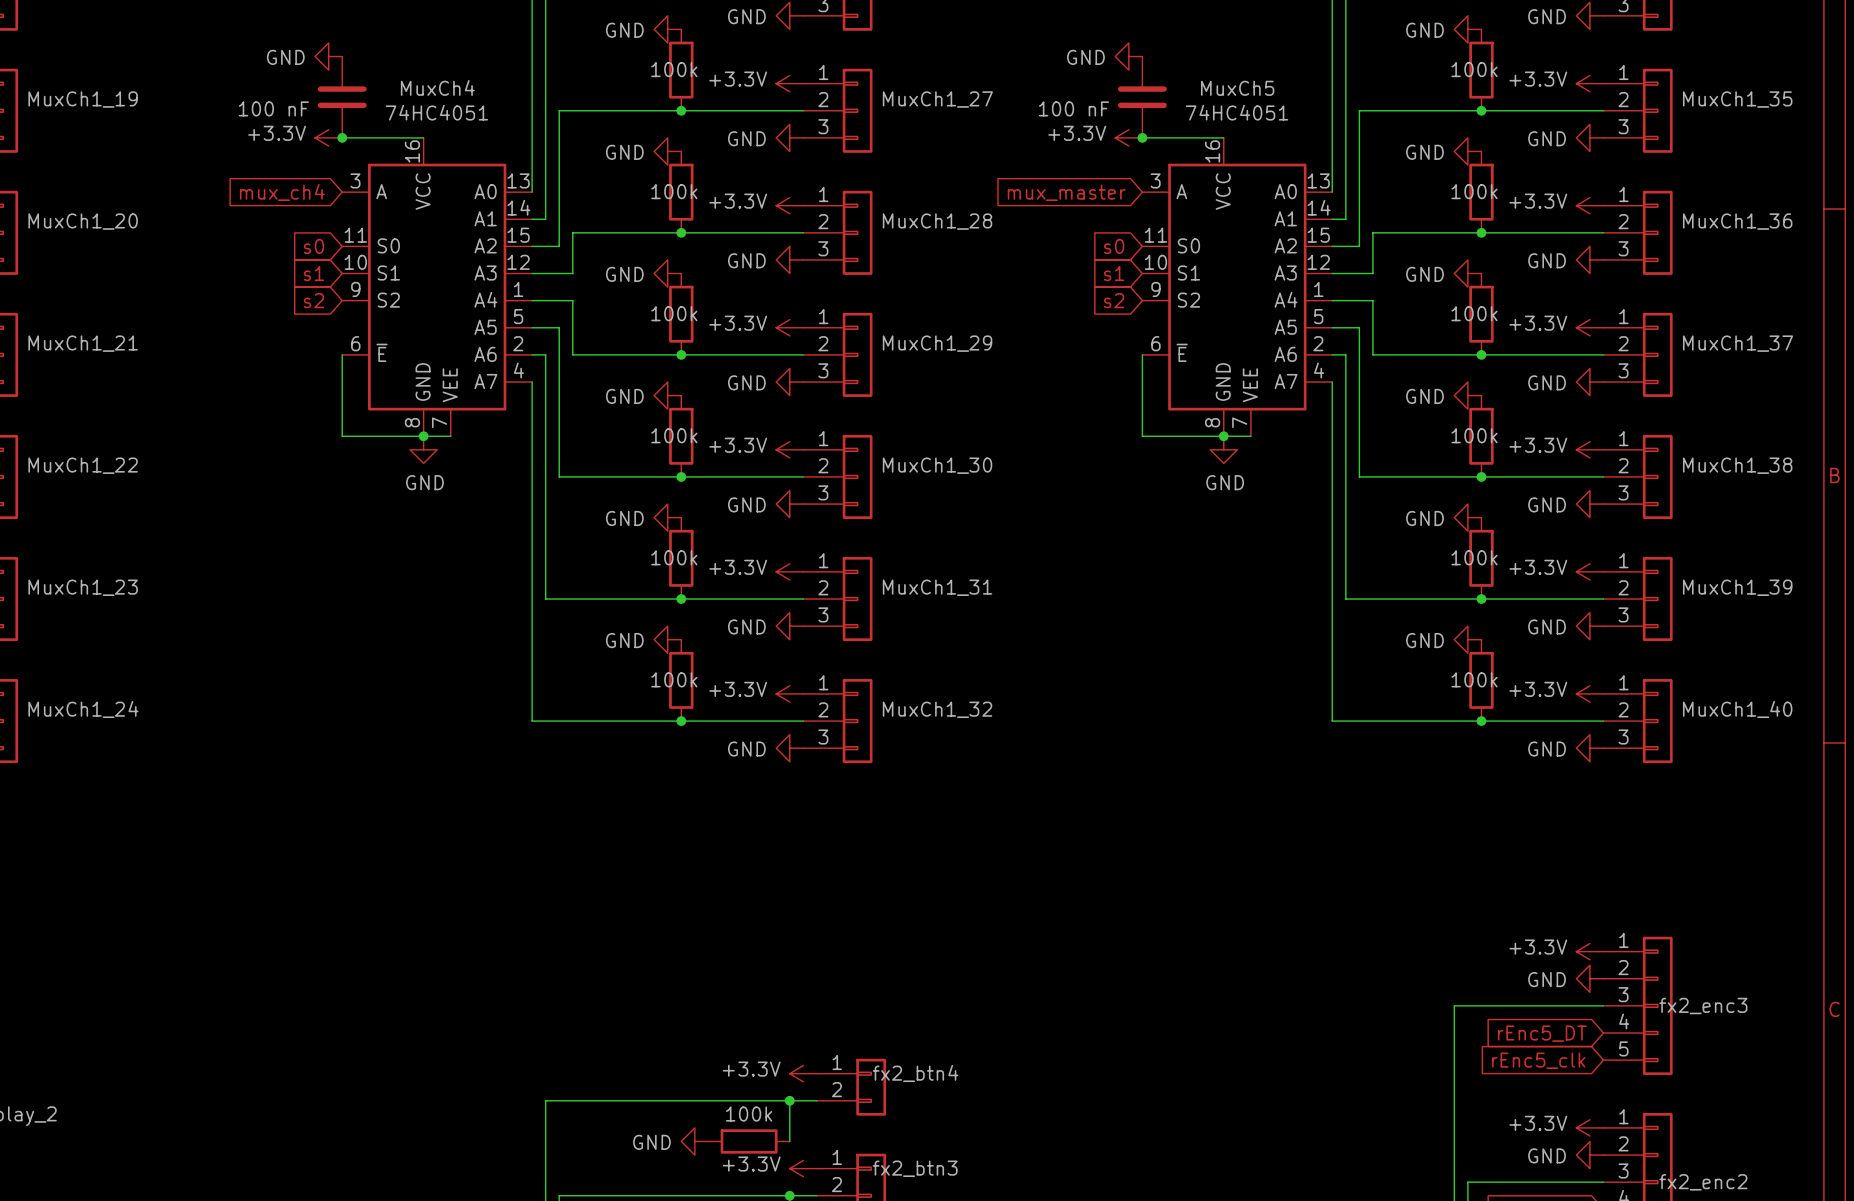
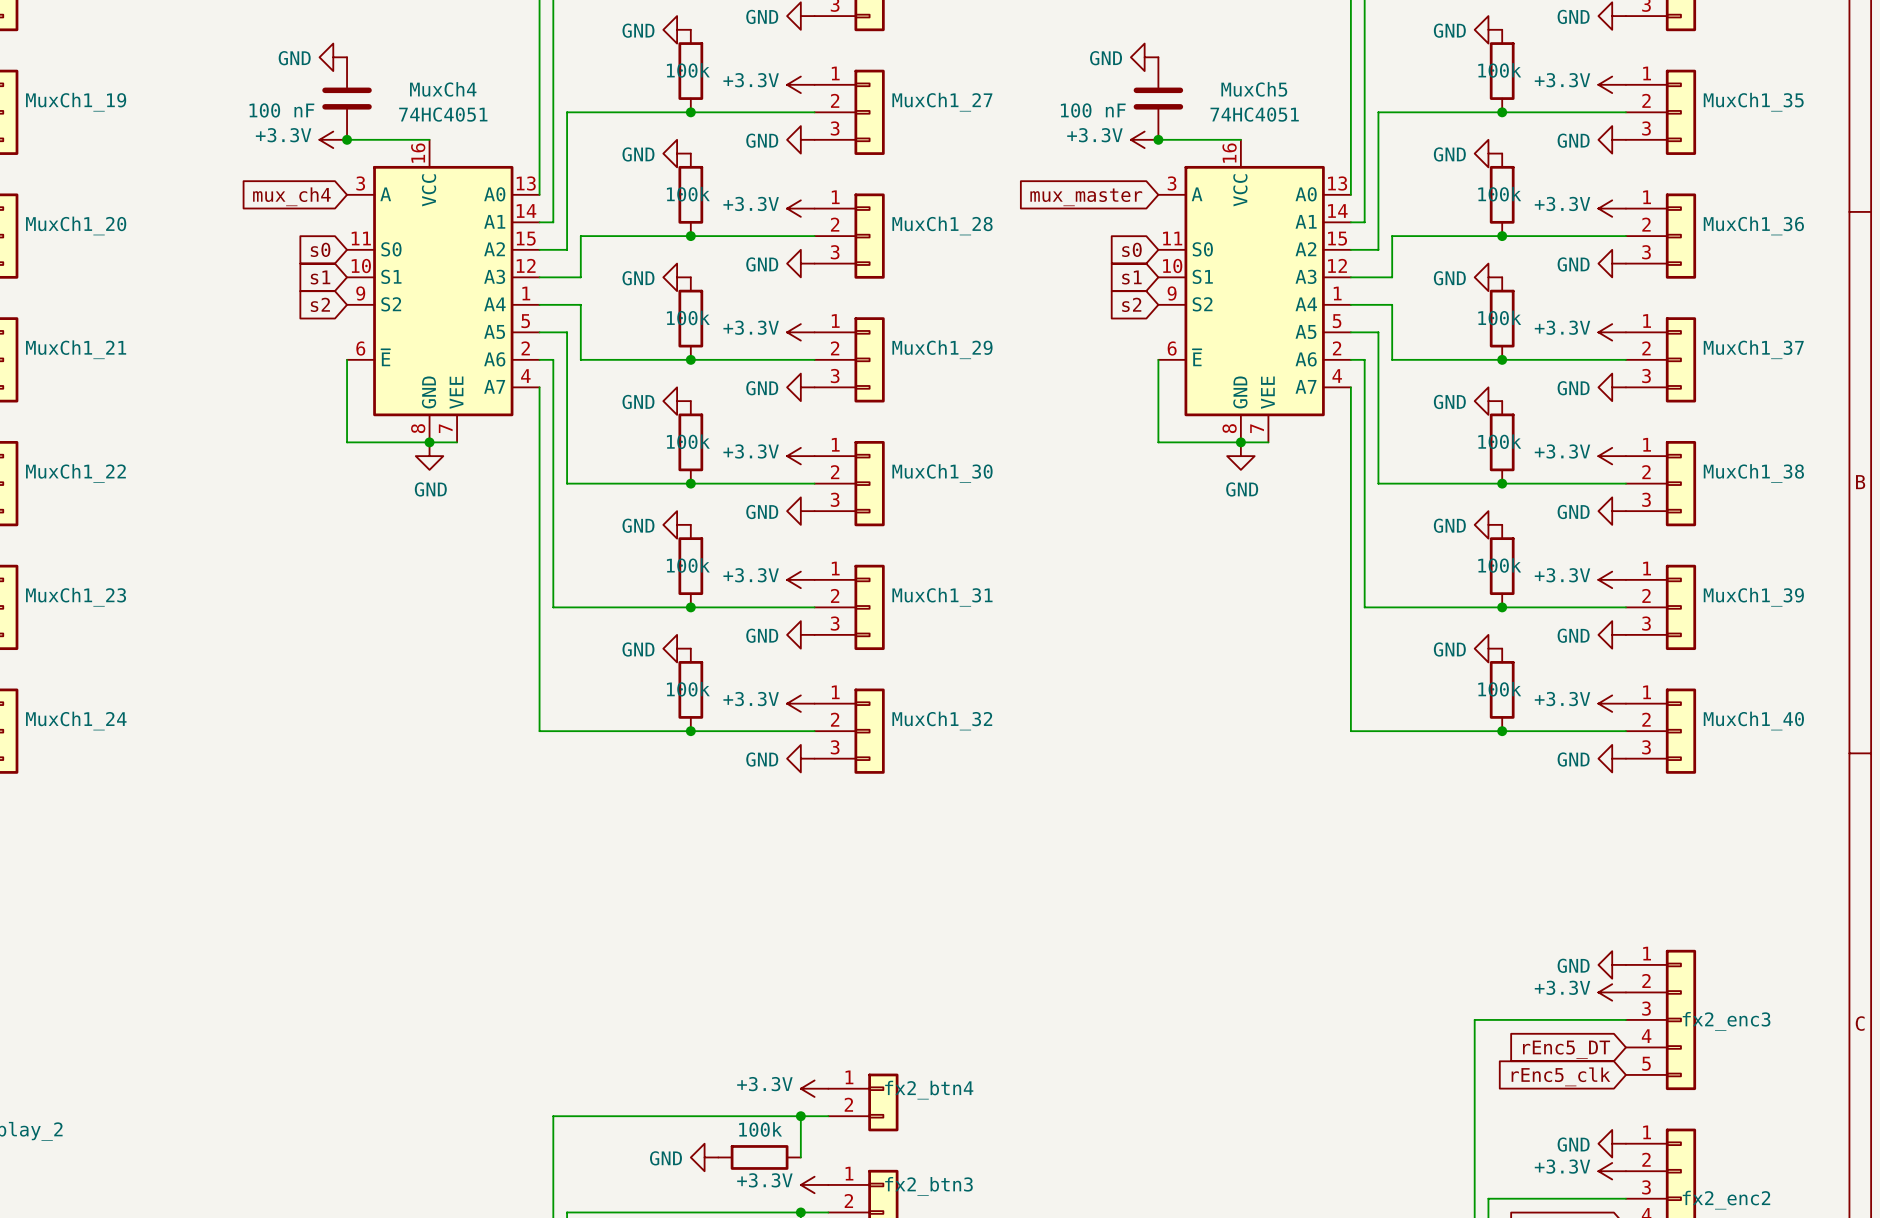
power symbol: +3.3V (1589, 951) -> GND (1612, 964)
power symbol: GND (1589, 978) -> +3.3V (1612, 992)
power symbol: +3.3V (1589, 1127) -> GND (1612, 1143)
power symbol: GND (1589, 1155) -> +3.3V (1612, 1171)

